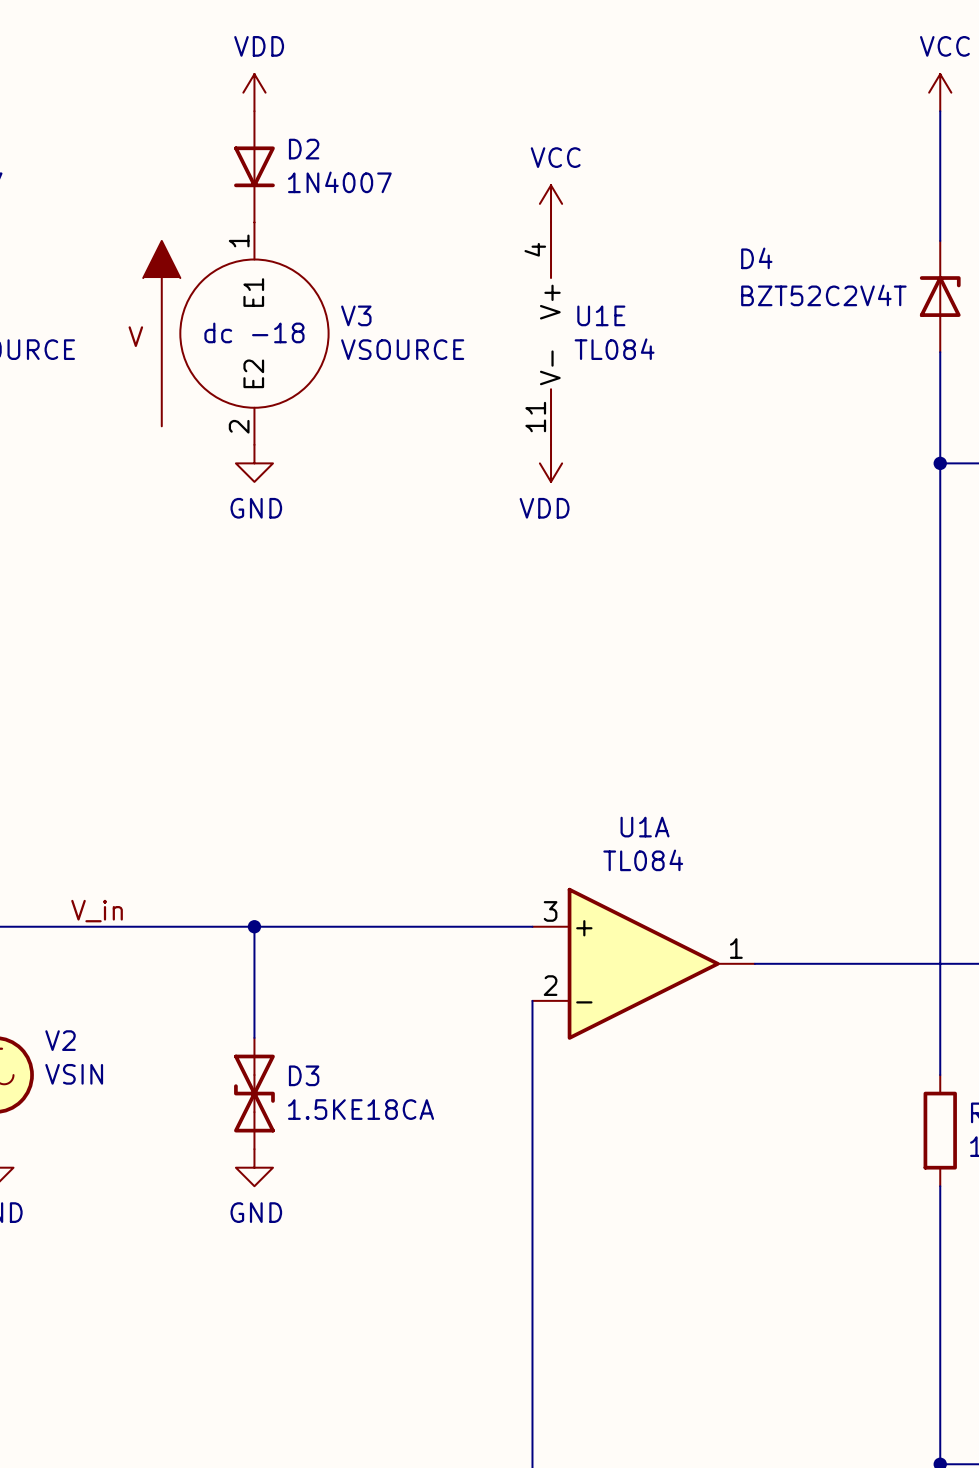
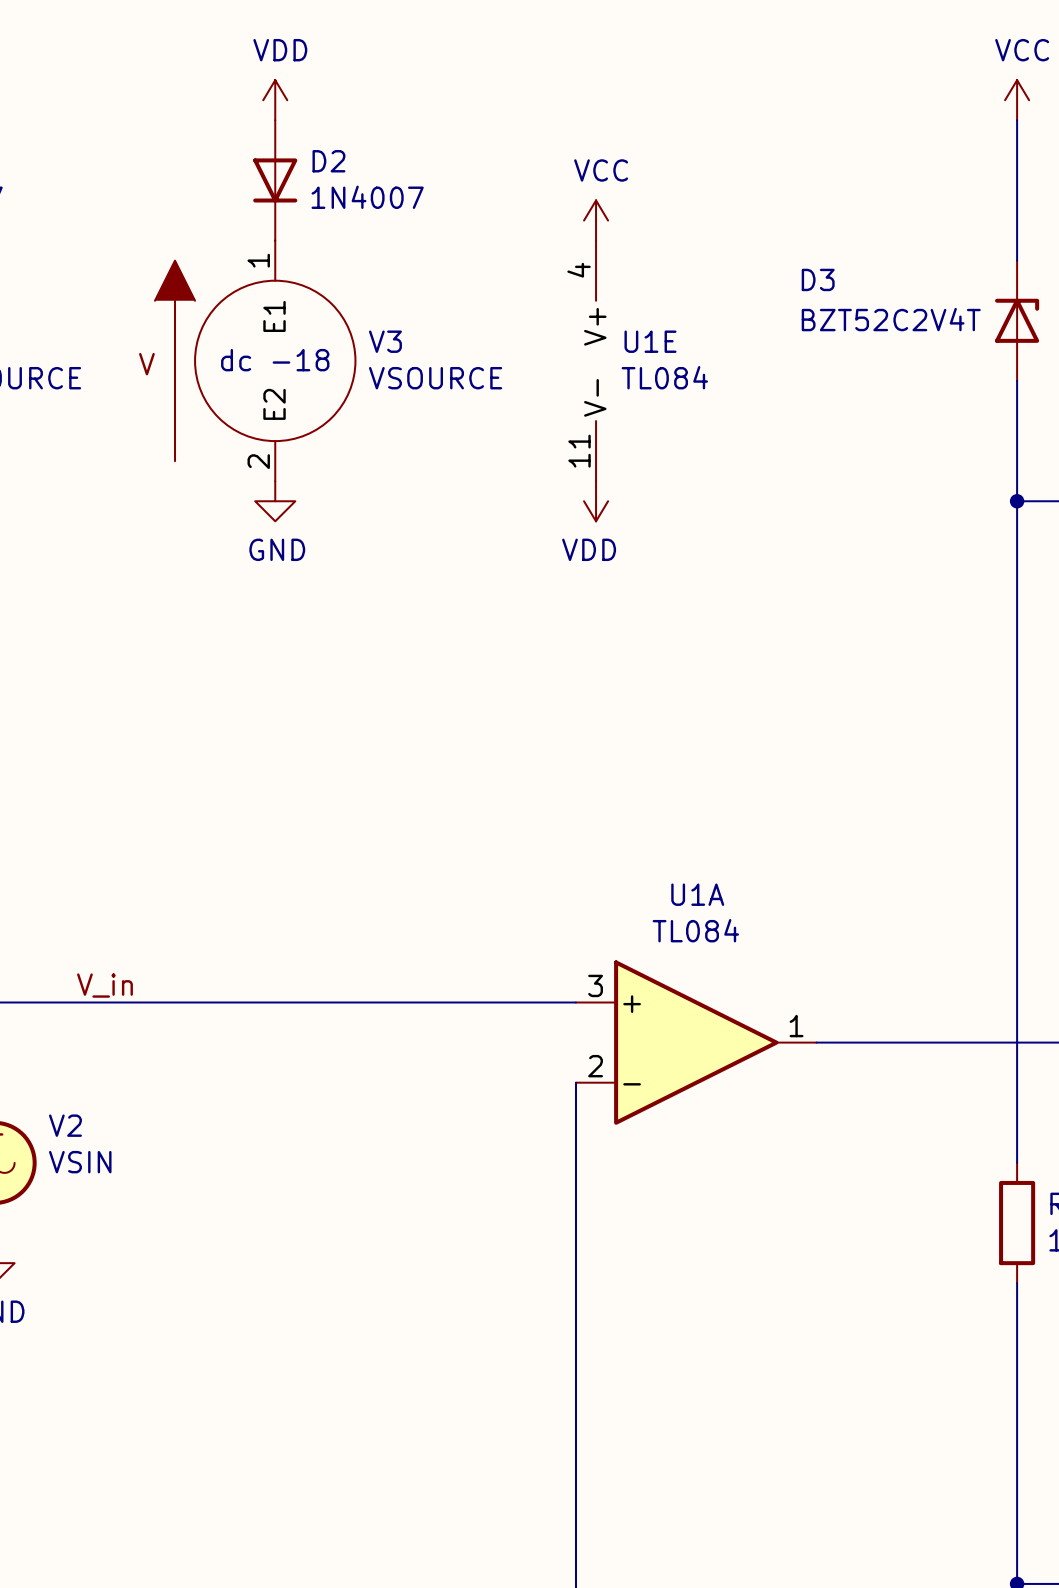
D4 name: D4 (756, 258) -> D3 (818, 279)
wire: (254, 926) (254, 1037) -> none
junction: (254, 926) -> none
D3: 1.5KE18CA (254, 1093) -> none
power symbol: GND (254, 1167) -> none

